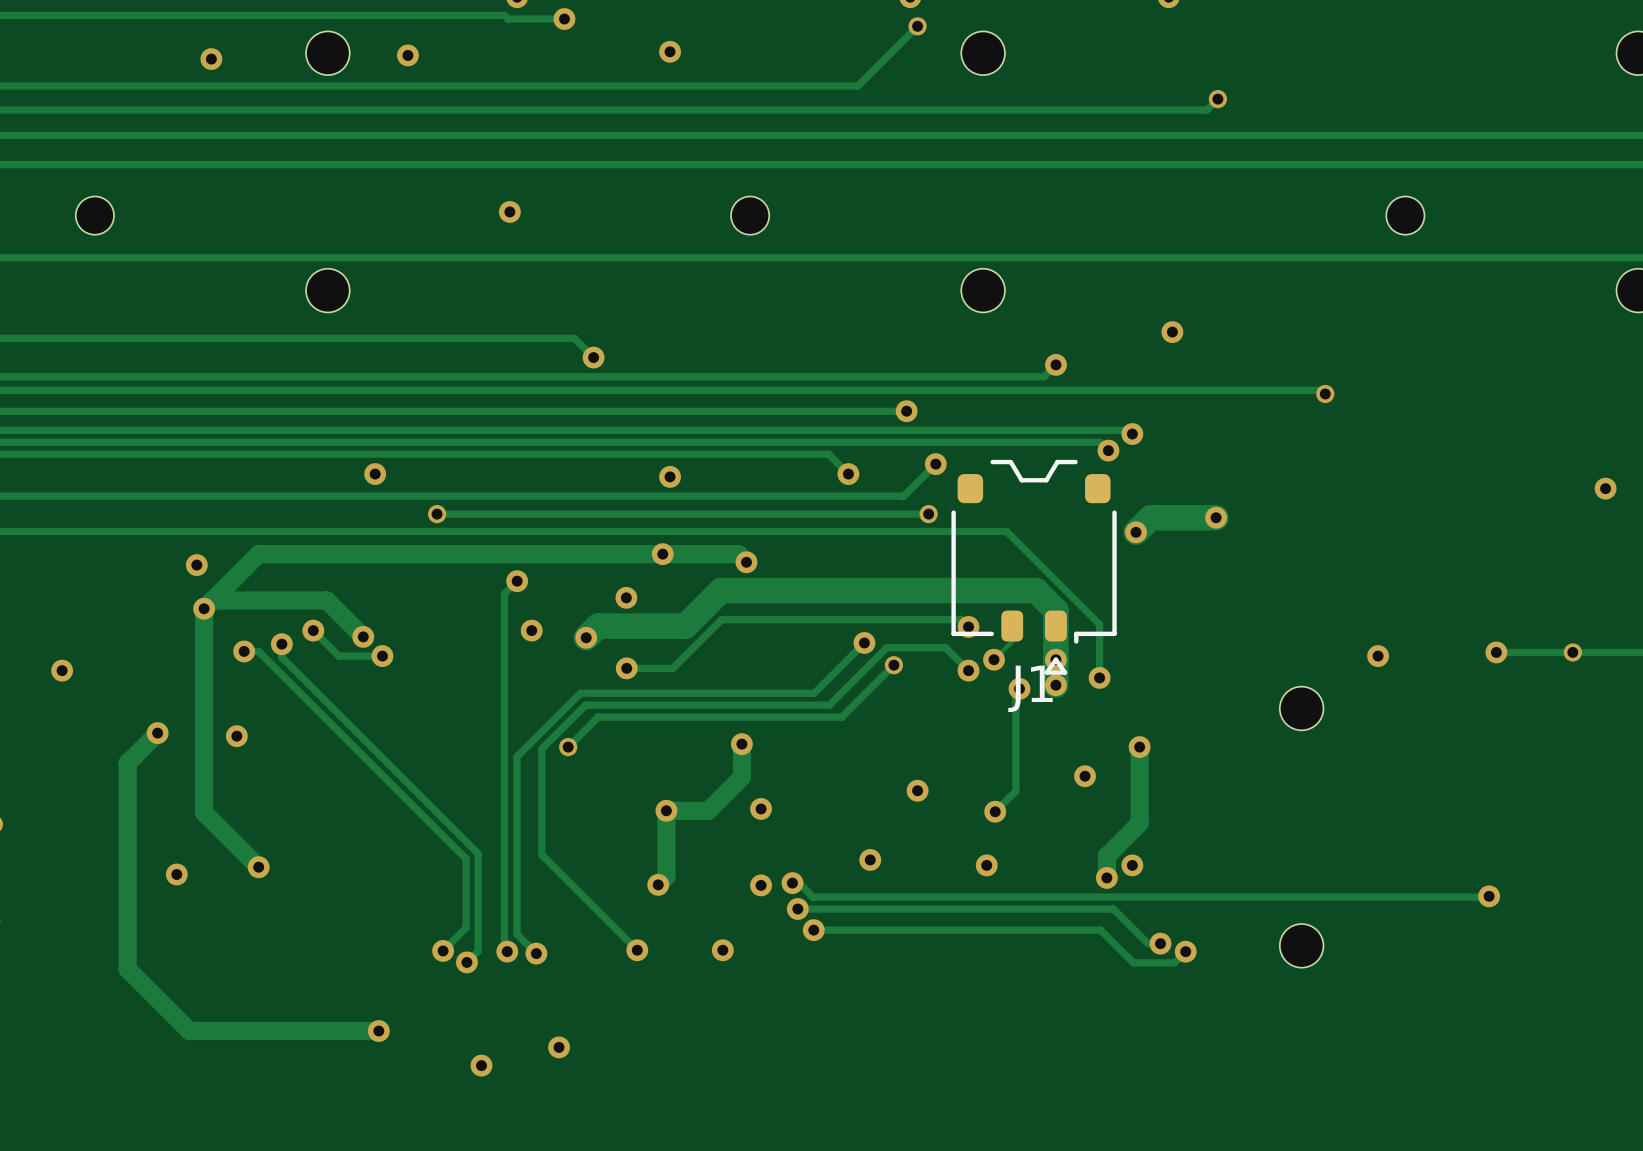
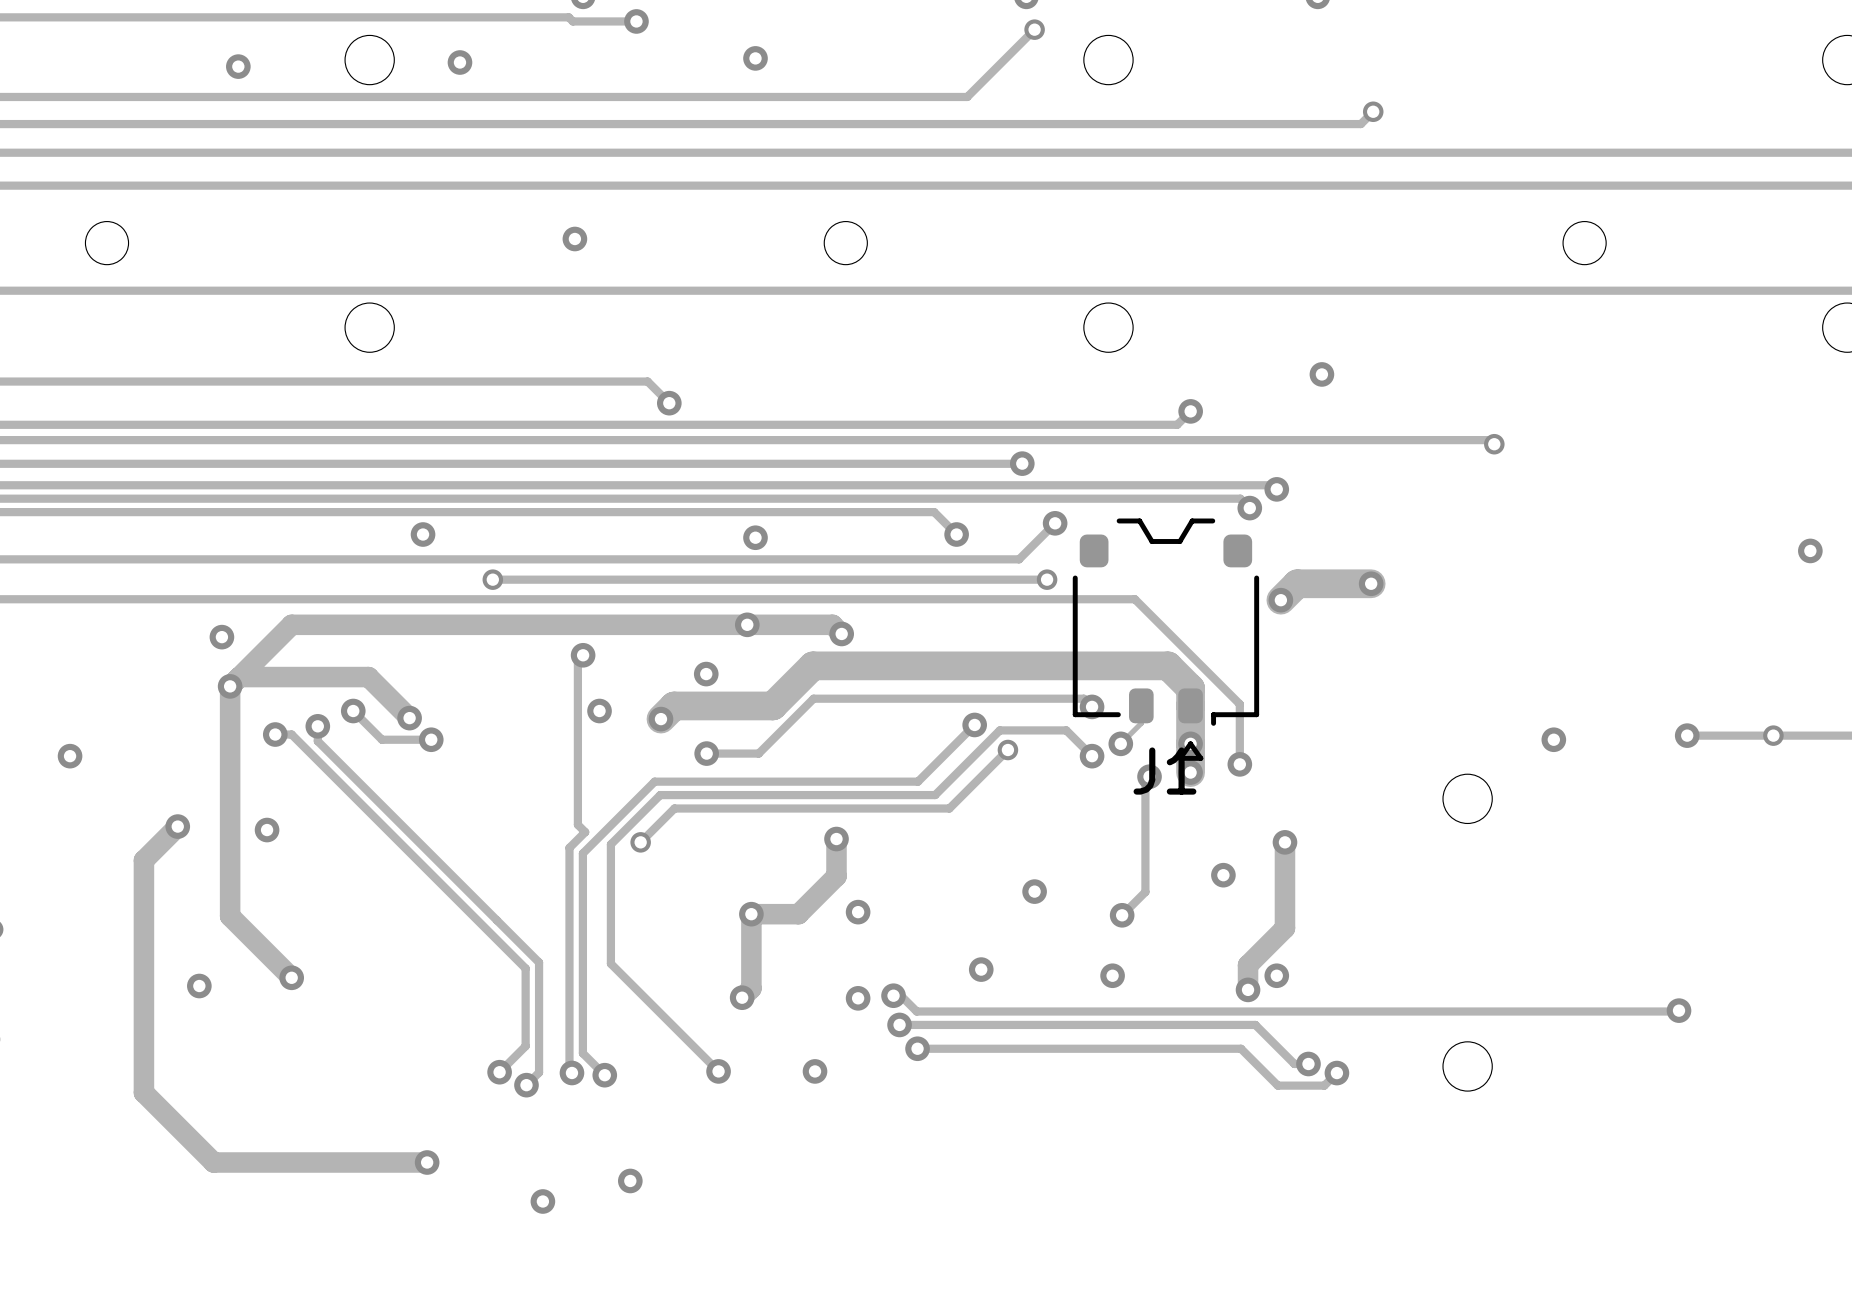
track: (512, 585) (504, 593) (505, 949) -> (577, 660) (577, 824) (585, 832) (569, 847) (569, 1070)

